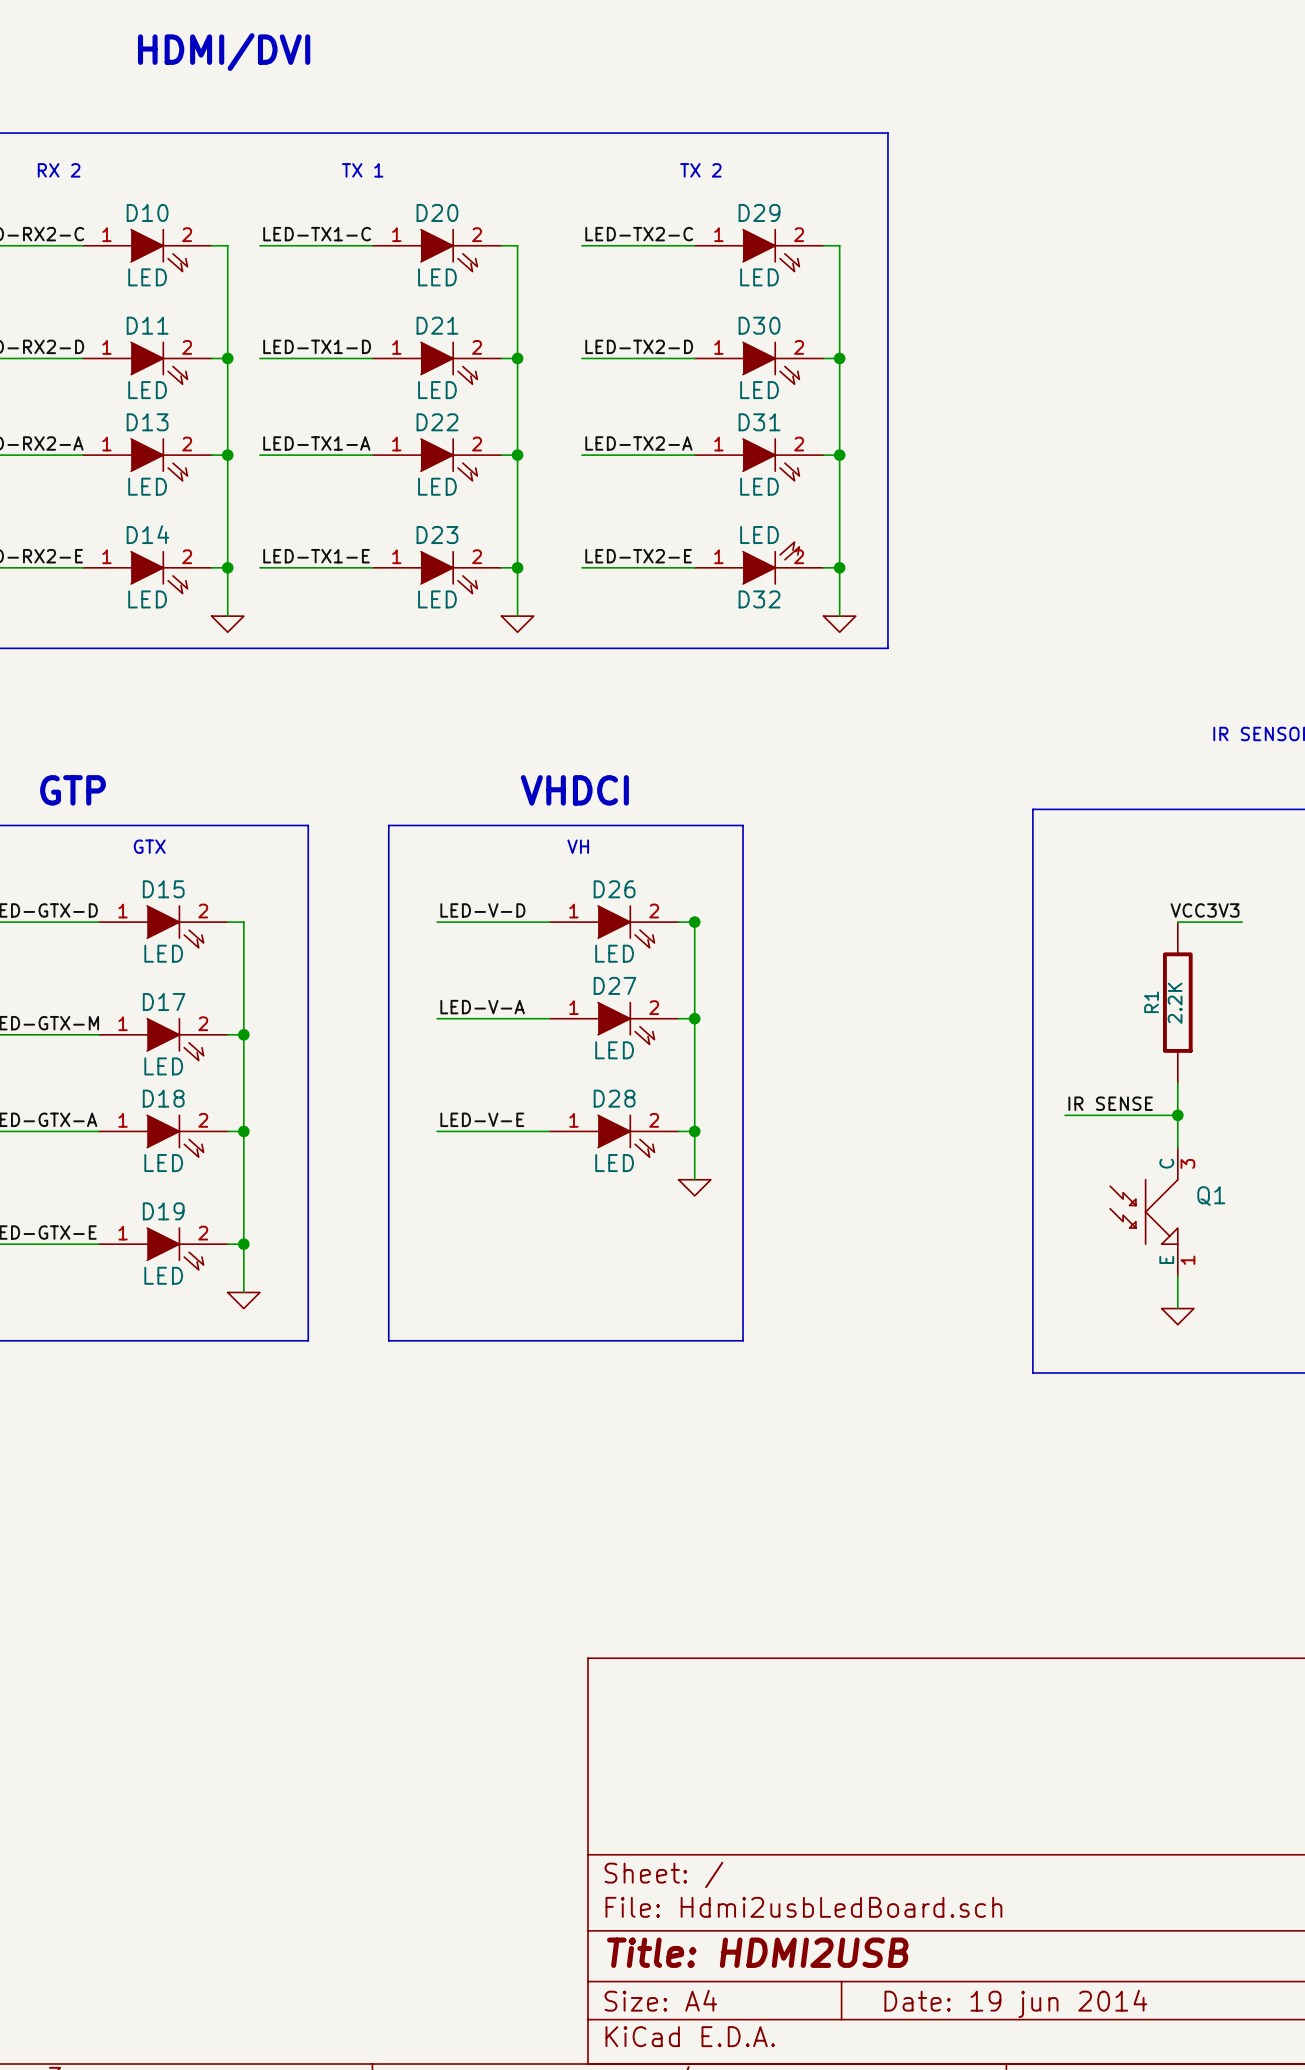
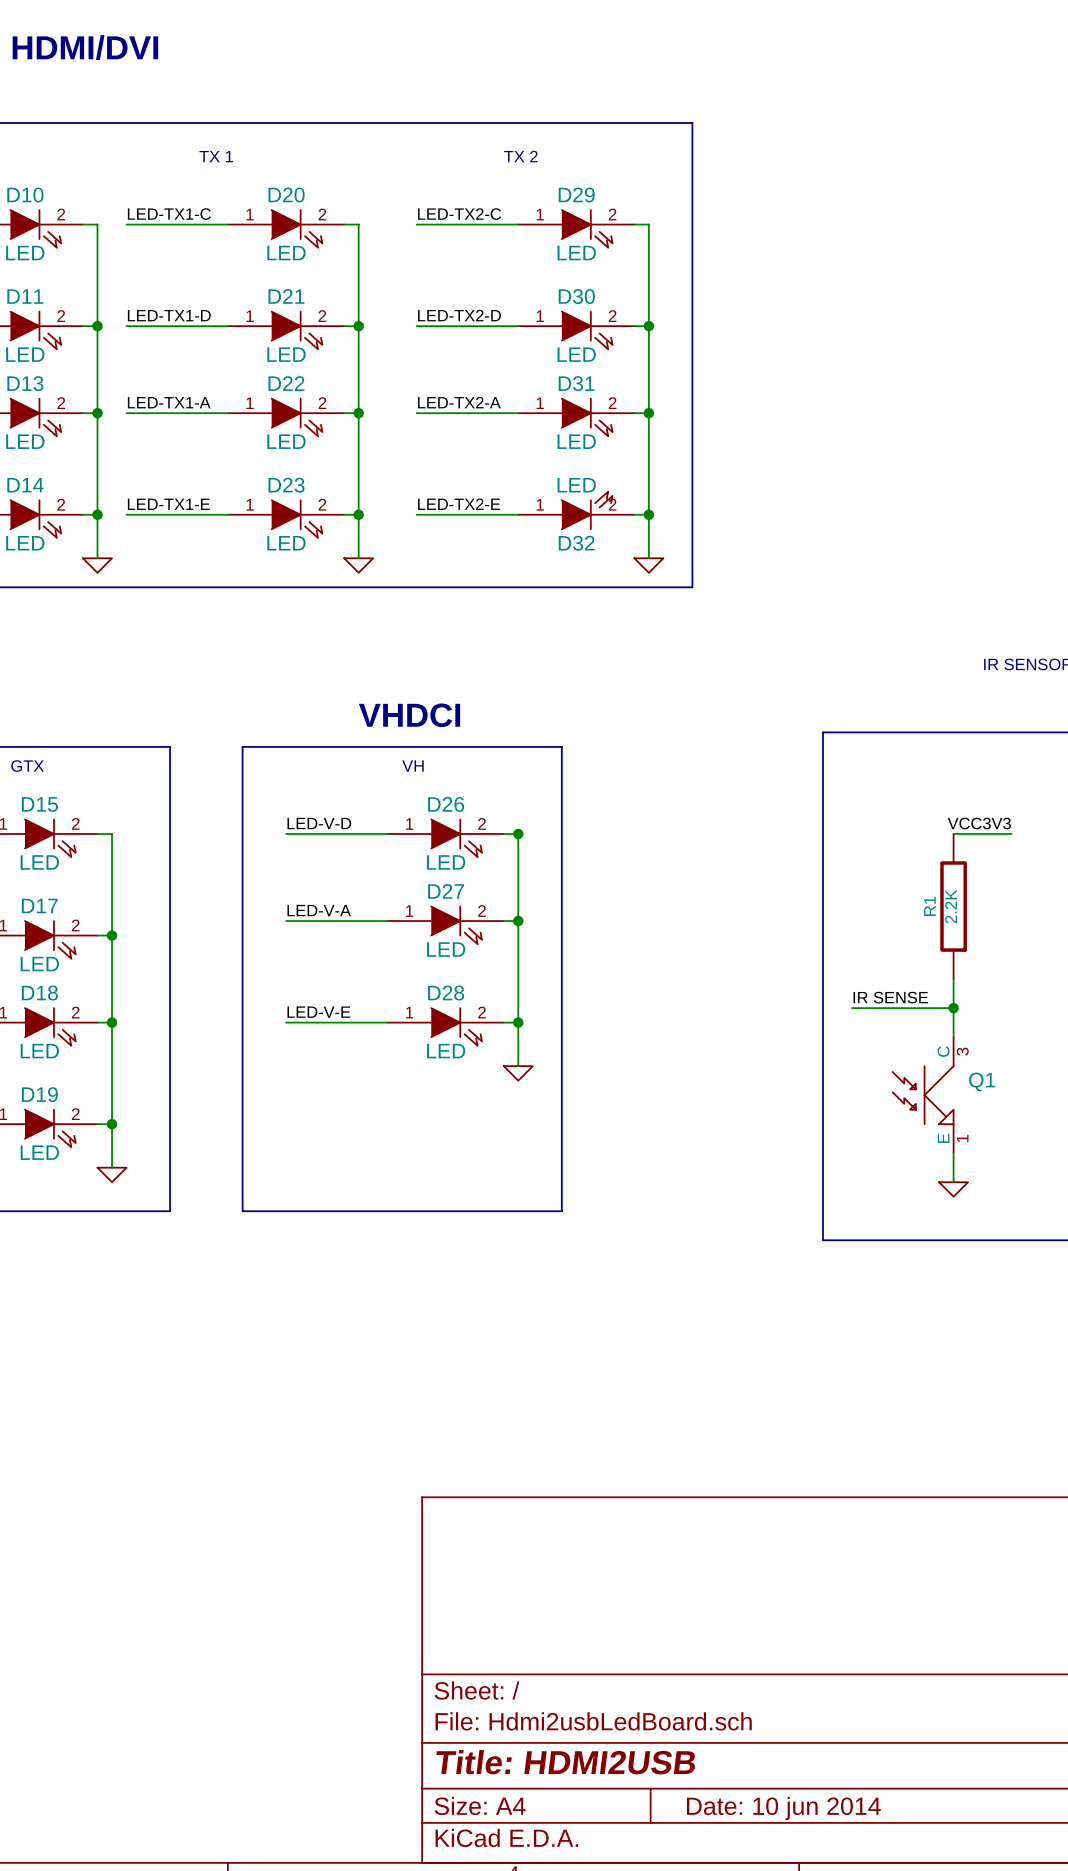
title block: Date: 19 jun 2014 (1015, 2003) -> Date: 10 jun 2014 (783, 1808)

